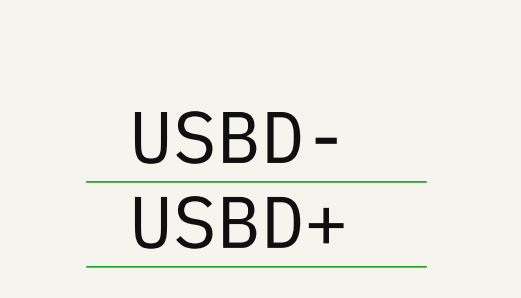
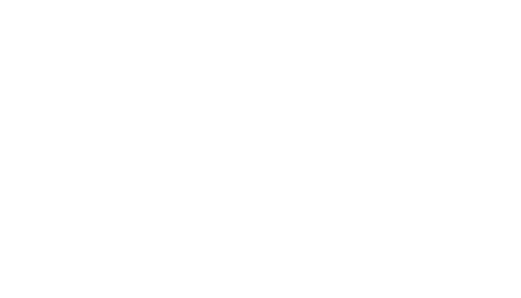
label: USBD- (235, 137) -> none
wire: (86, 181) (426, 181) -> none
label: USBD+ (239, 222) -> none
wire: (86, 266) (426, 266) -> none

